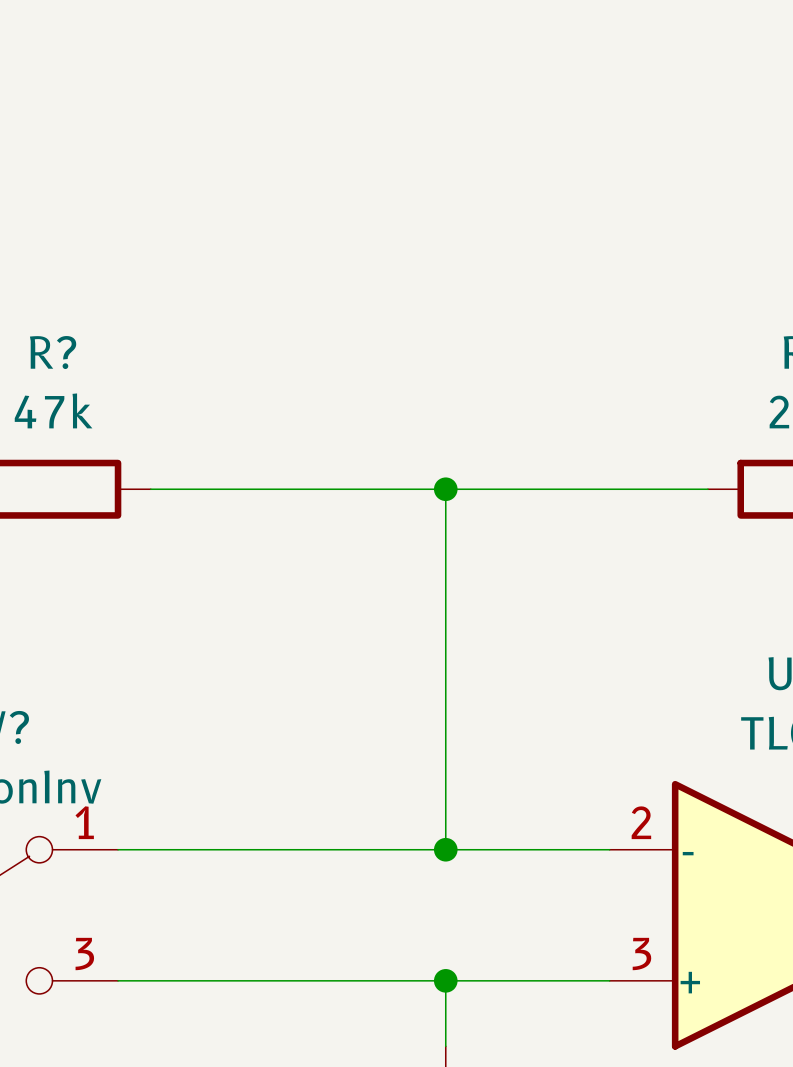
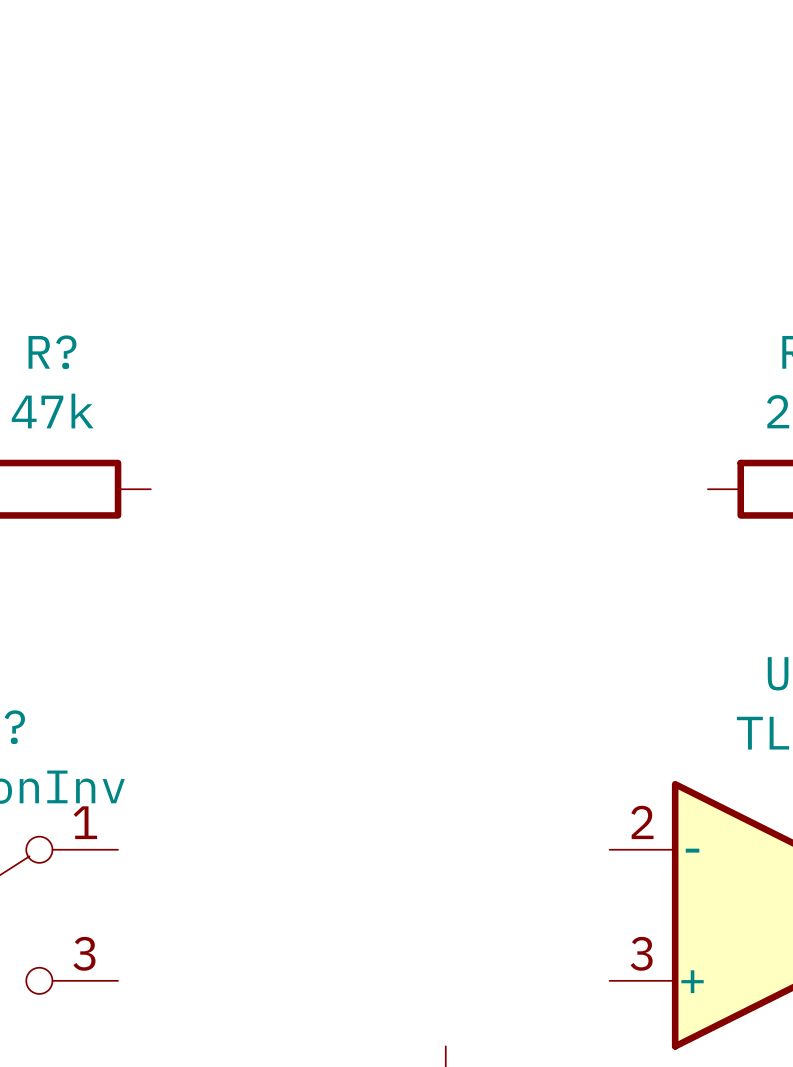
wire: (150, 489) (707, 489) -> none
wire: (445, 489) (445, 849) -> none
junction: (445, 489) -> none
wire: (118, 849) (609, 849) -> none
junction: (445, 849) -> none
wire: (118, 980) (609, 980) -> none
wire: (445, 980) (445, 1046) -> none
junction: (445, 980) -> none

